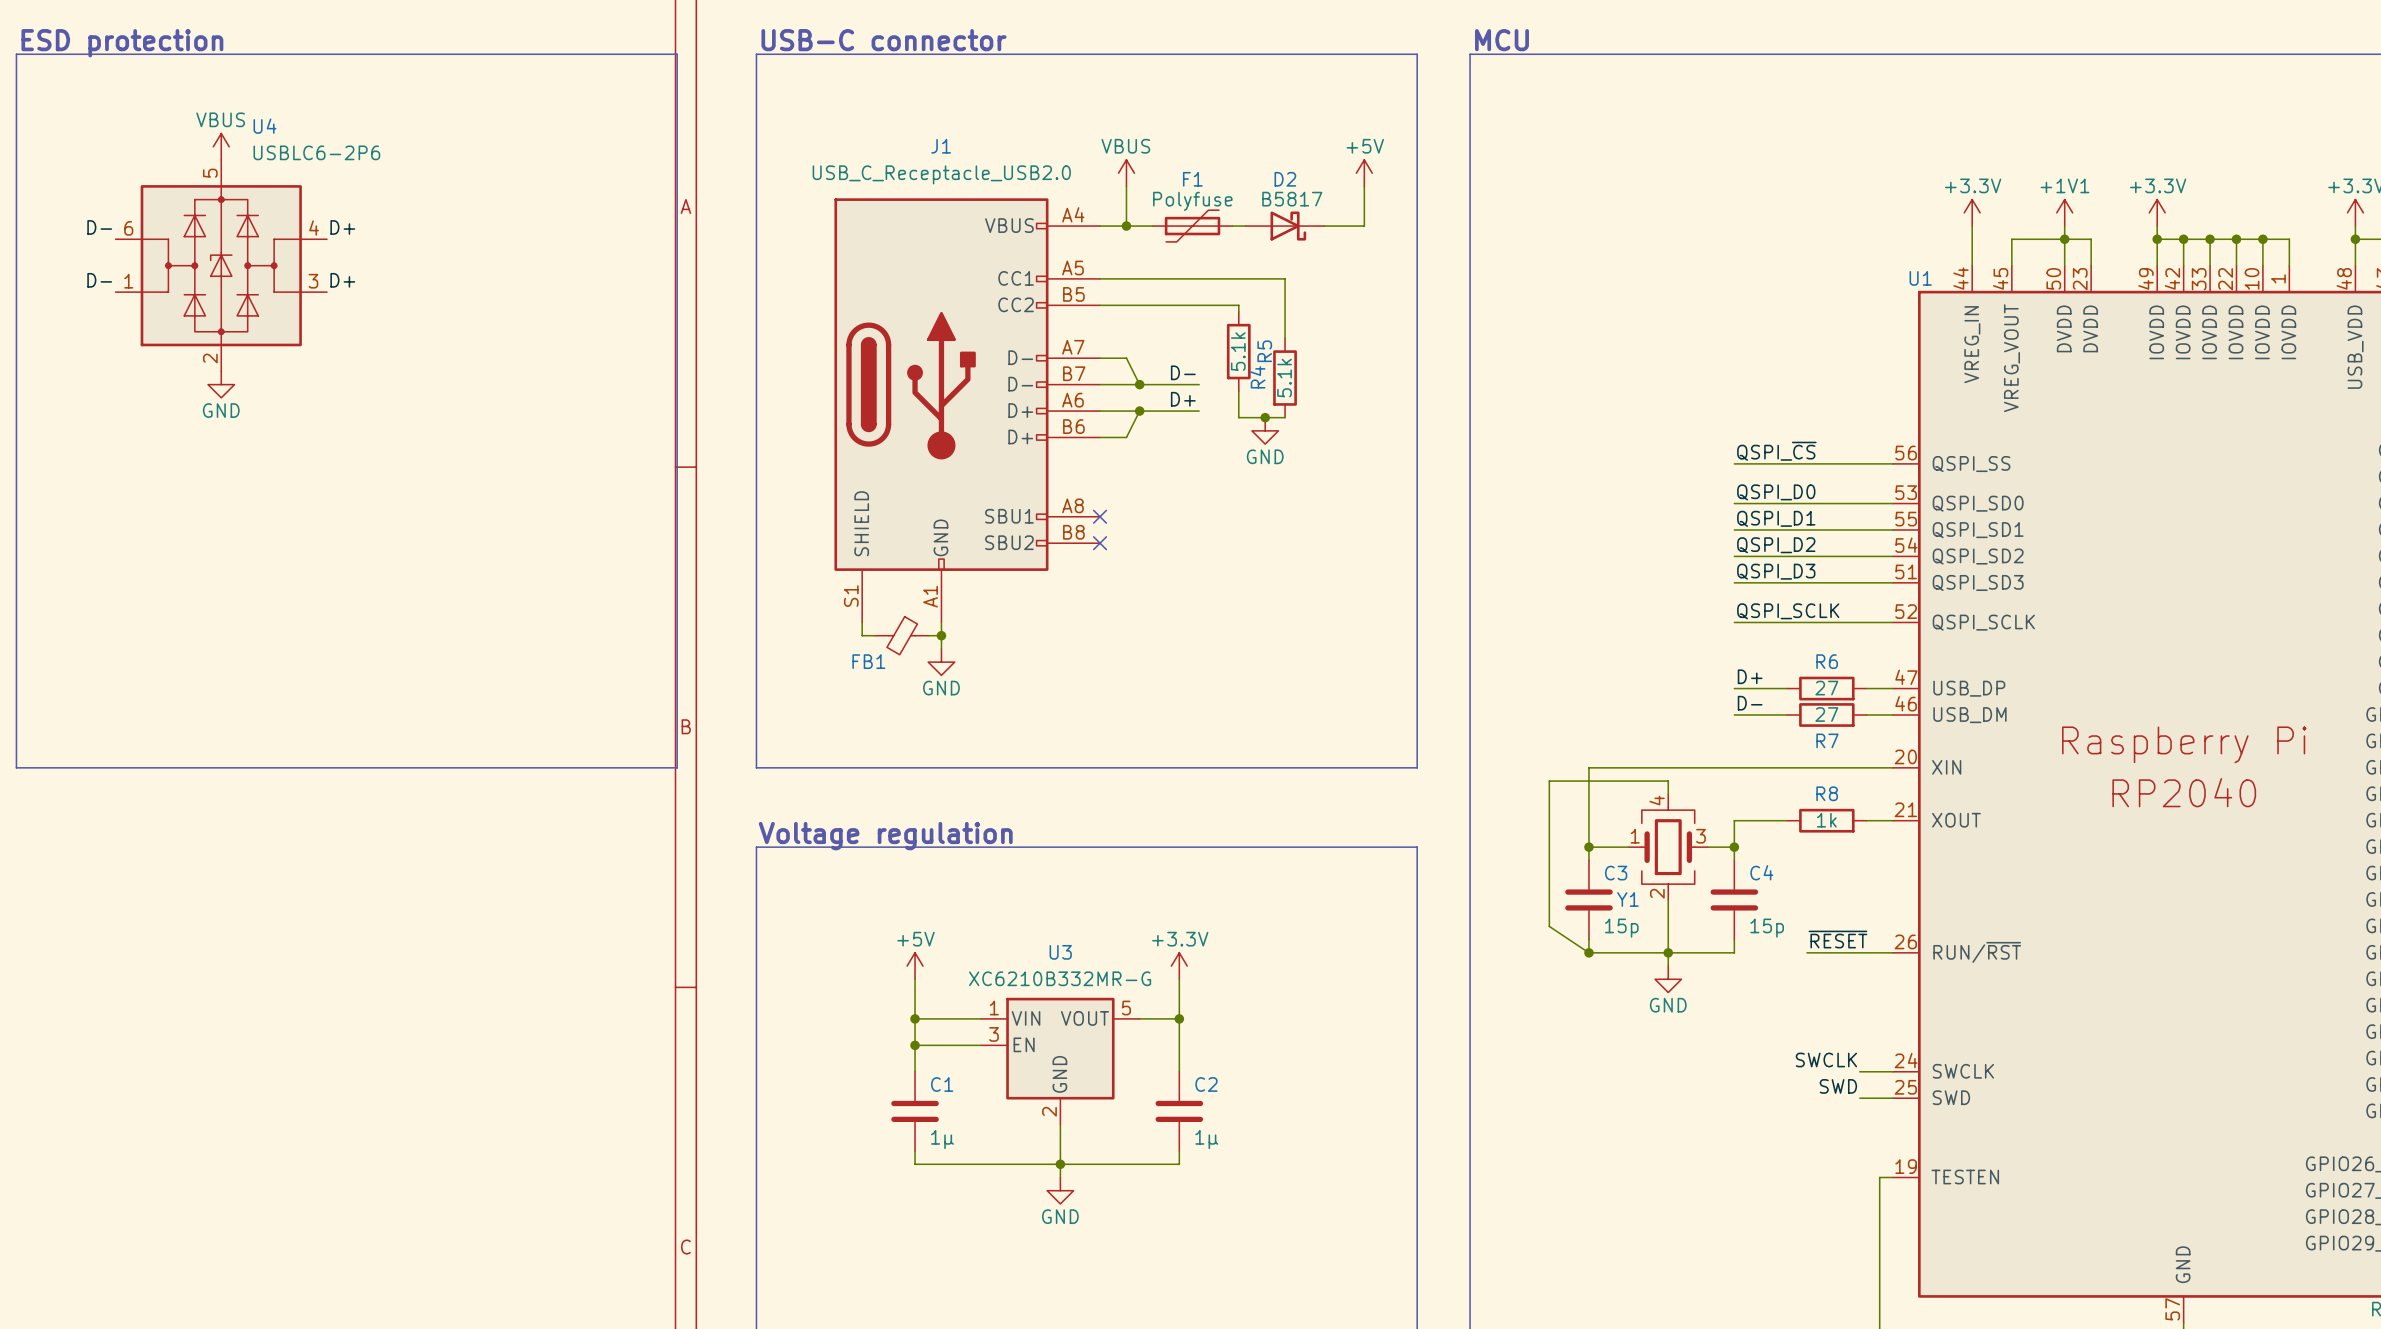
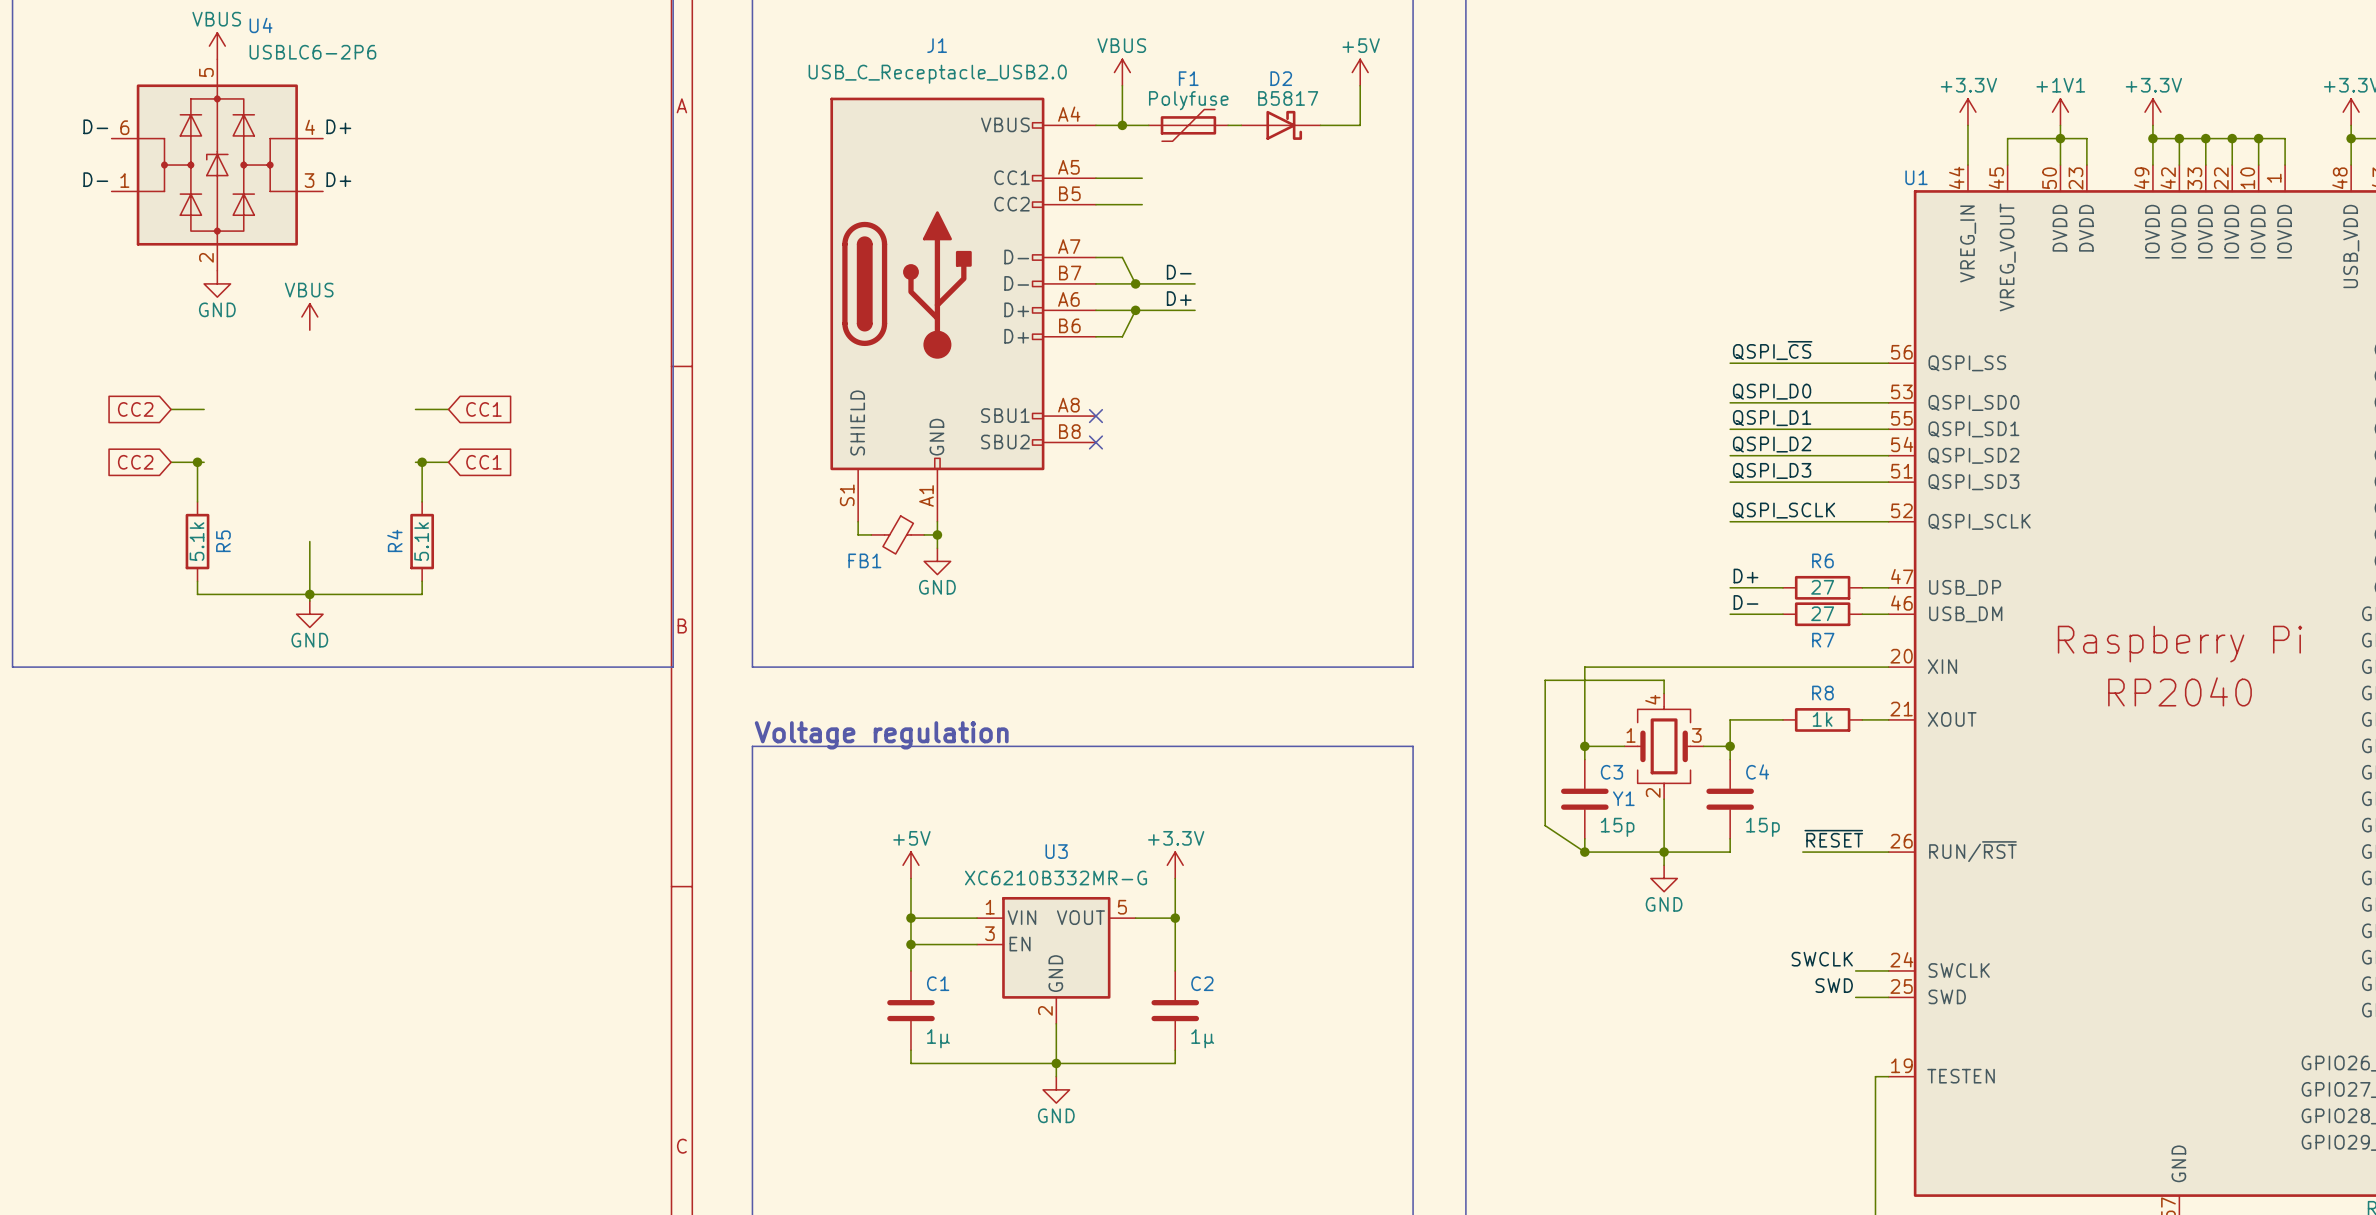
wire: (1146, 278) (1285, 278) (1285, 338) -> none
wire: (1146, 305) (1238, 305) (1238, 311) -> none
R5 position: (1238, 351) -> (197, 541)
R4 position: (1285, 378) -> (422, 541)
wire: (1238, 391) (1238, 417) (1285, 417) -> none
power symbol: none -> VBUS (309, 316)
junction: (1265, 417) -> none
power symbol: GND (1265, 430) -> none
global label: none -> CC2 (135, 409)
wire: none -> (171, 409) (204, 409)
wire: none -> (415, 409) (448, 409)
global label: none -> CC1 (483, 409)
global label: none -> CC2 (135, 462)
wire: none -> (171, 462) (204, 462)
wire: none -> (197, 462) (197, 501)
junction: none -> (197, 462)
wire: none -> (415, 462) (448, 462)
wire: none -> (422, 462) (422, 501)
junction: none -> (422, 462)
global label: none -> CC1 (483, 462)
wire: none -> (309, 541) (309, 601)
wire: none -> (197, 581) (197, 594) (422, 594) (422, 581)
junction: none -> (309, 594)
power symbol: none -> GND (309, 614)

